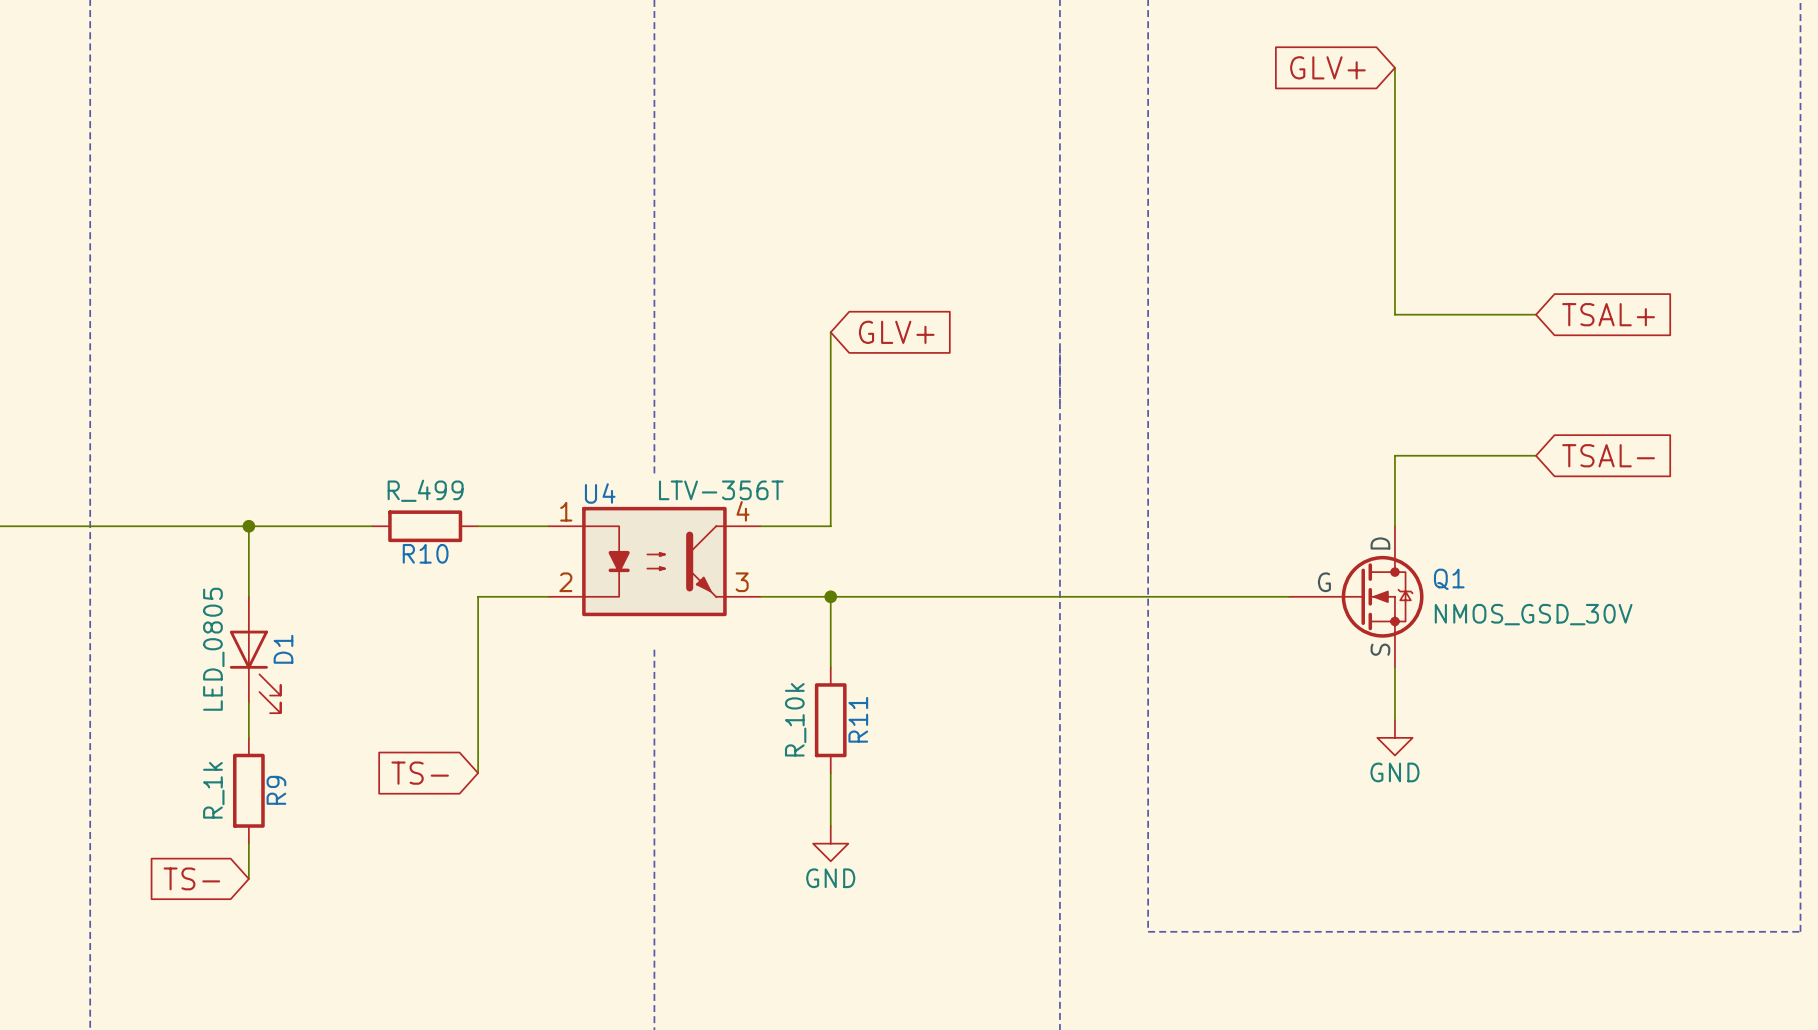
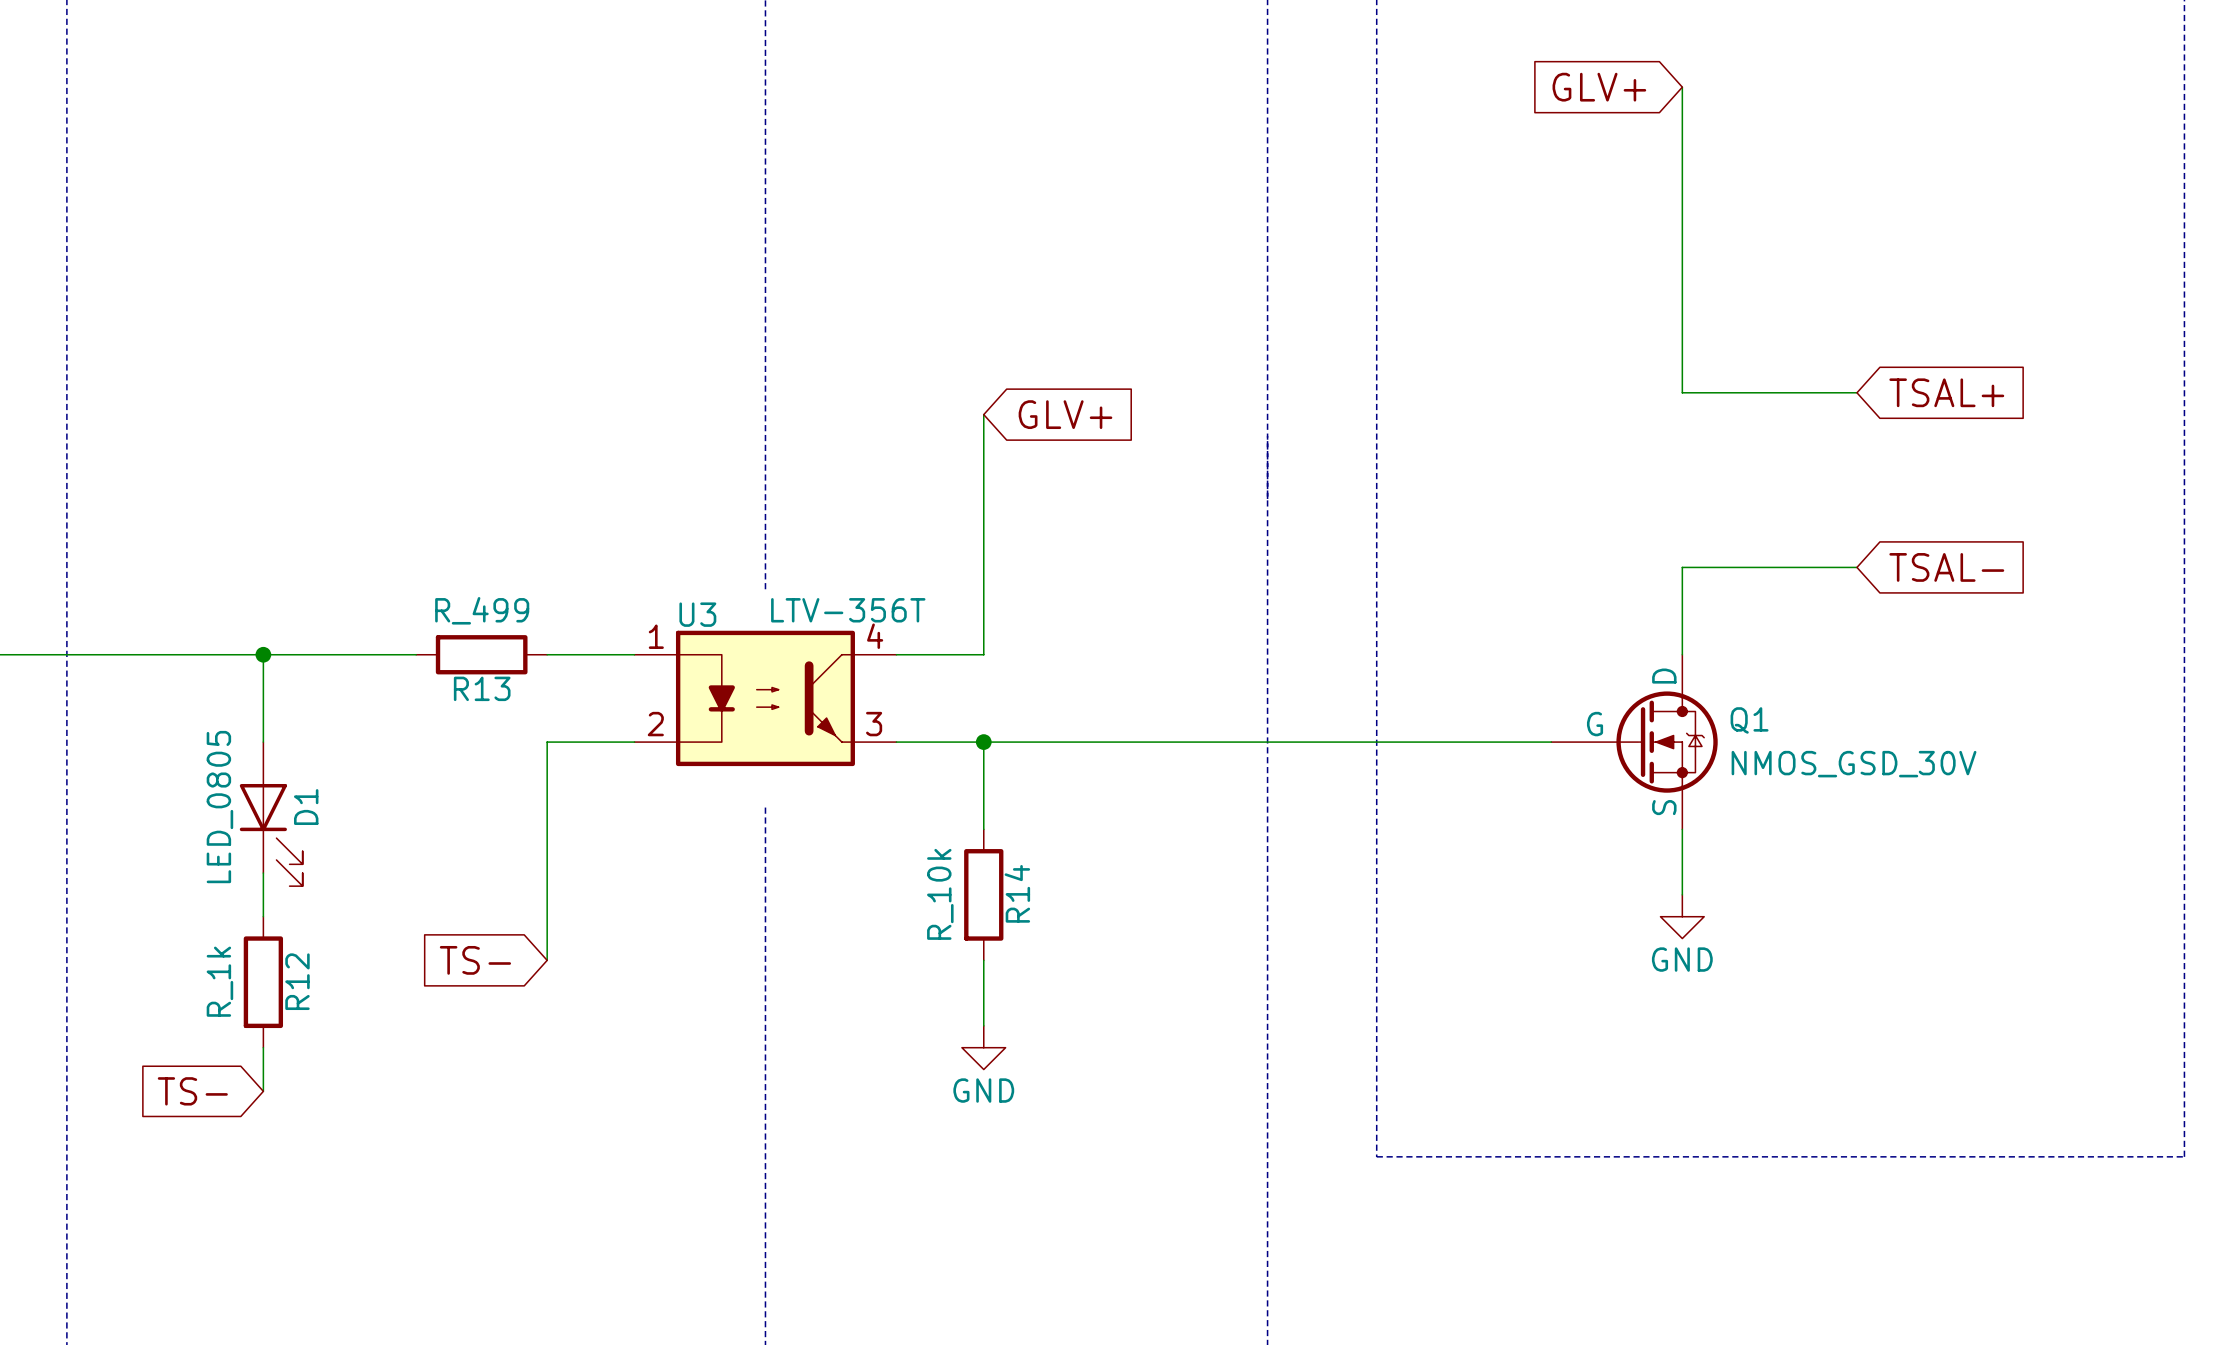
U4 name: U4 (600, 493) -> U3 (697, 614)
R10 name: R10 (425, 553) -> R13 (482, 688)
R11 name: R11 (858, 719) -> R14 (1017, 893)
R9 name: R9 (276, 790) -> R12 (297, 981)

